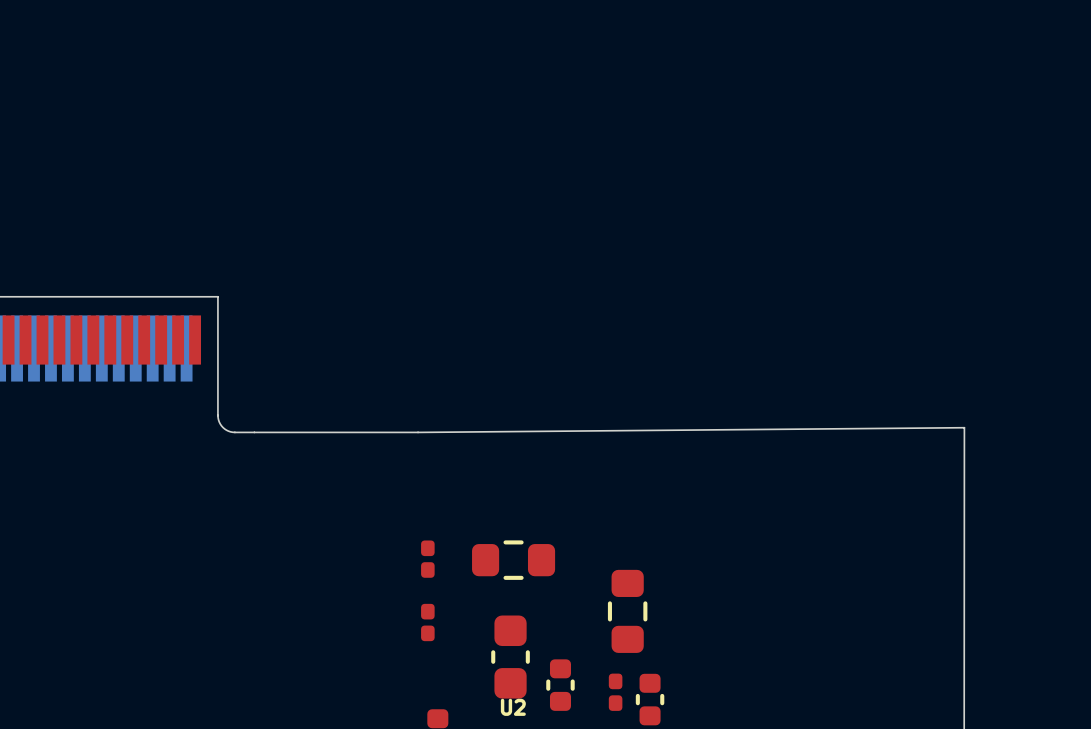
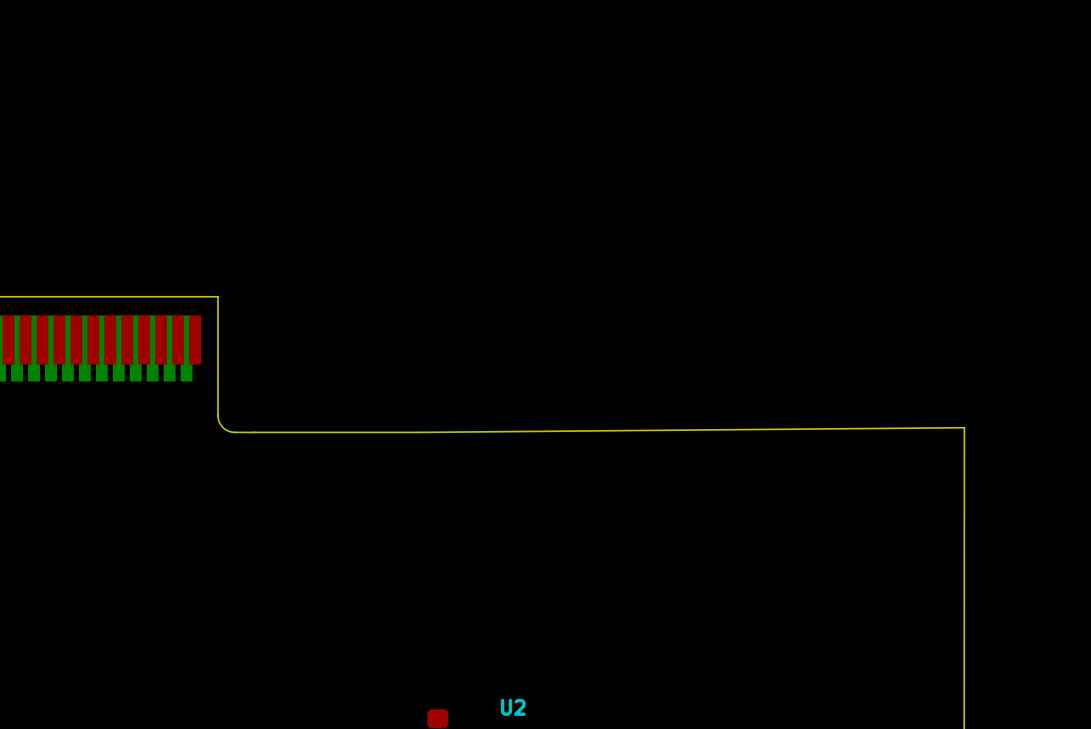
part: (427, 559) -> none
part: (513, 560) -> none
part: (627, 611) -> none
part: (427, 622) -> none
part: (510, 657) -> none
part: (560, 685) -> none
part: (615, 692) -> none
part: (650, 699) -> none

